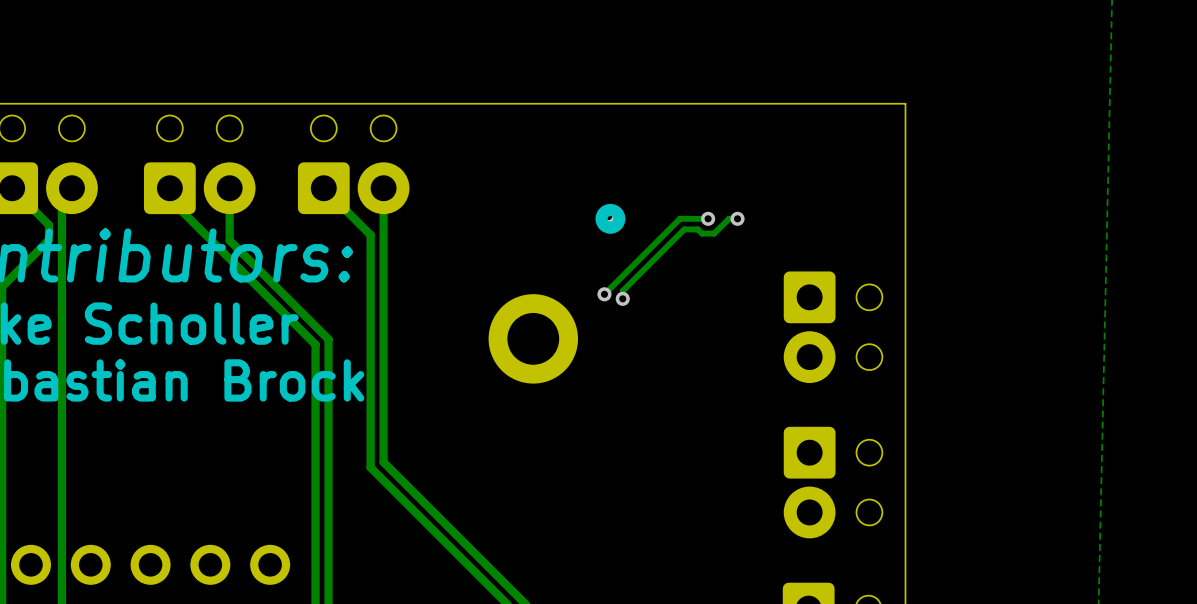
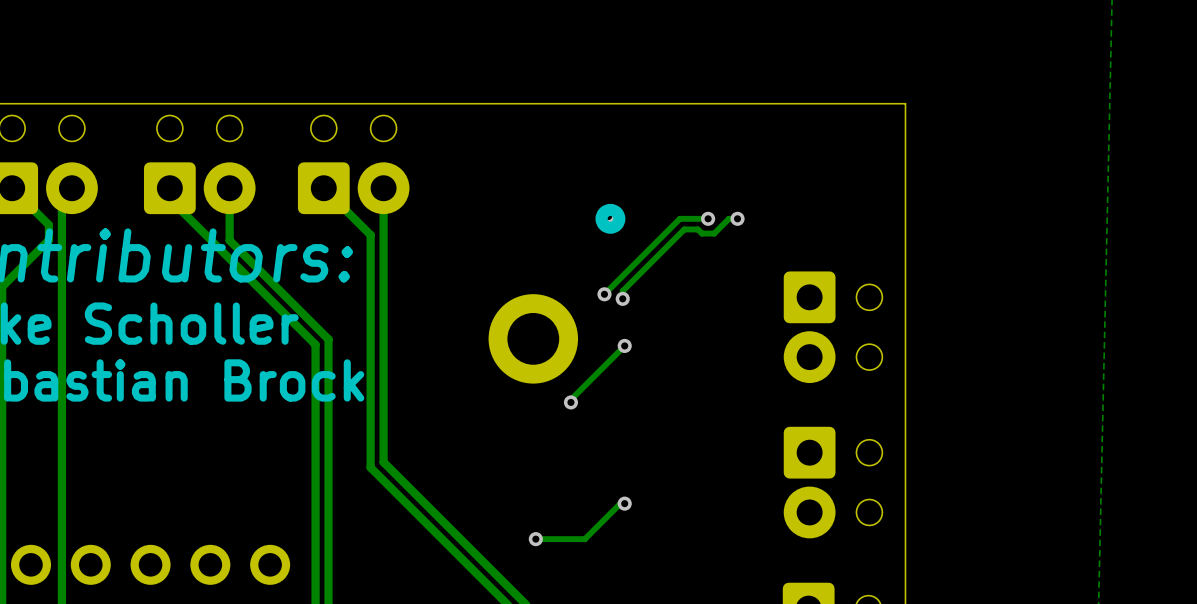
track: none -> (624, 345) (570, 399) (570, 402)
via: none -> (624, 345)
via: none -> (570, 402)
track: none -> (624, 503) (620, 503) (584, 539) (535, 539)
via: none -> (624, 503)
via: none -> (535, 539)

